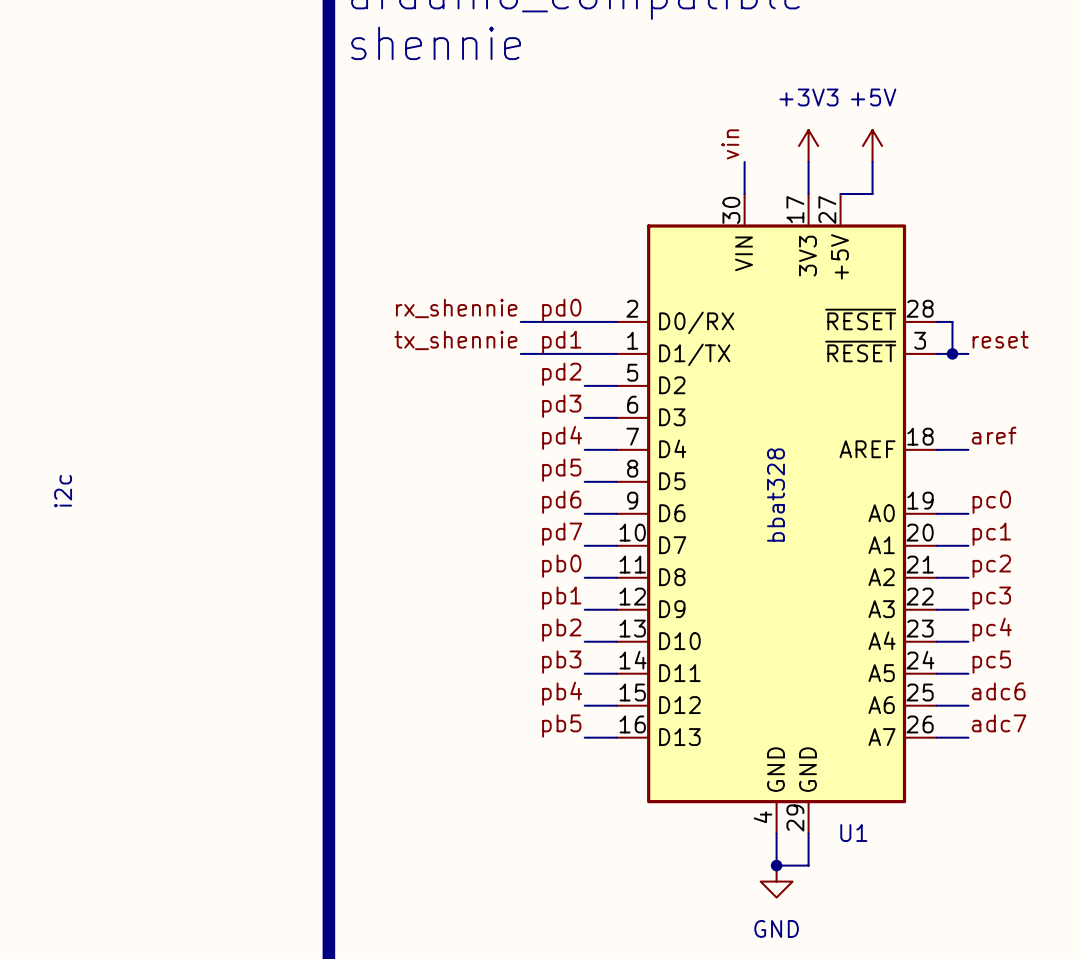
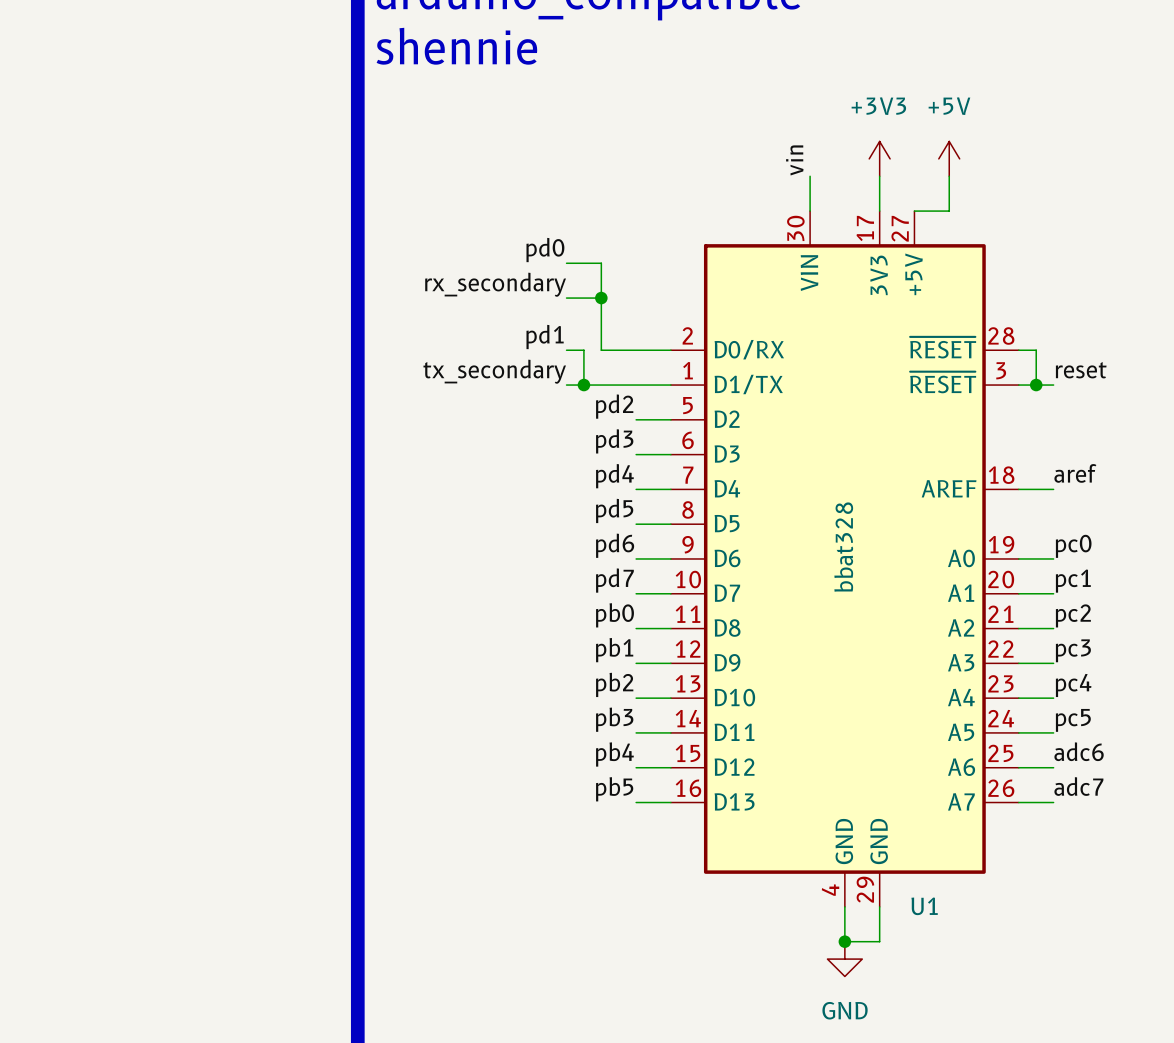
wire: none -> (566, 263) (601, 263) (601, 350)
label: none -> rx_secondary (495, 284)
wire: none -> (566, 298) (601, 298)
junction: none -> (601, 298)
label: rx_shennie (456, 308) -> pd1 (545, 337)
label position: pd0 (561, 310) -> pd0 (545, 250)
wire: (536, 321) (552, 321) -> (583, 350) (583, 385)
label: tx_shennie (455, 340) -> tx_secondary (494, 371)
label: pd1 (561, 342) -> none
junction: none -> (583, 385)
text: i2c (63, 491) -> none

